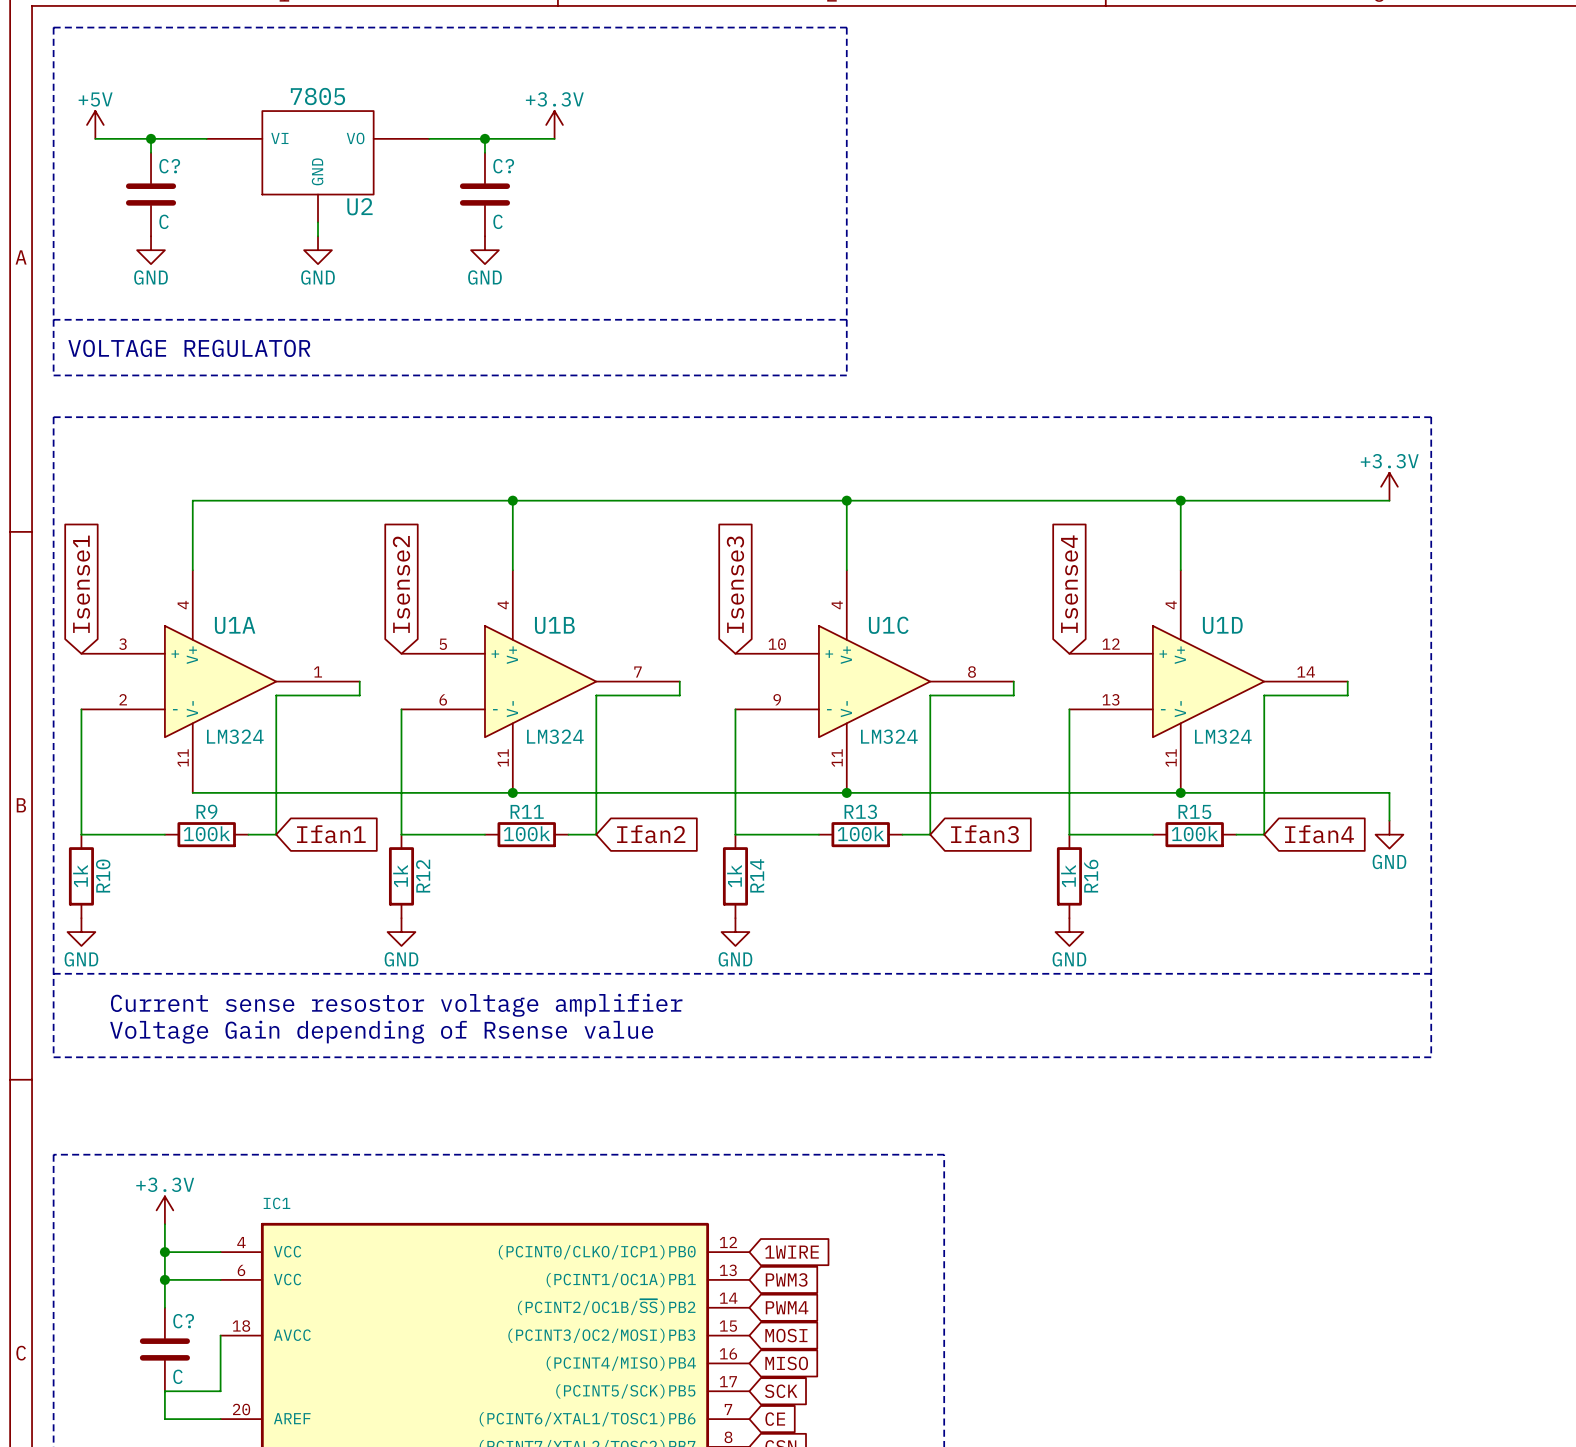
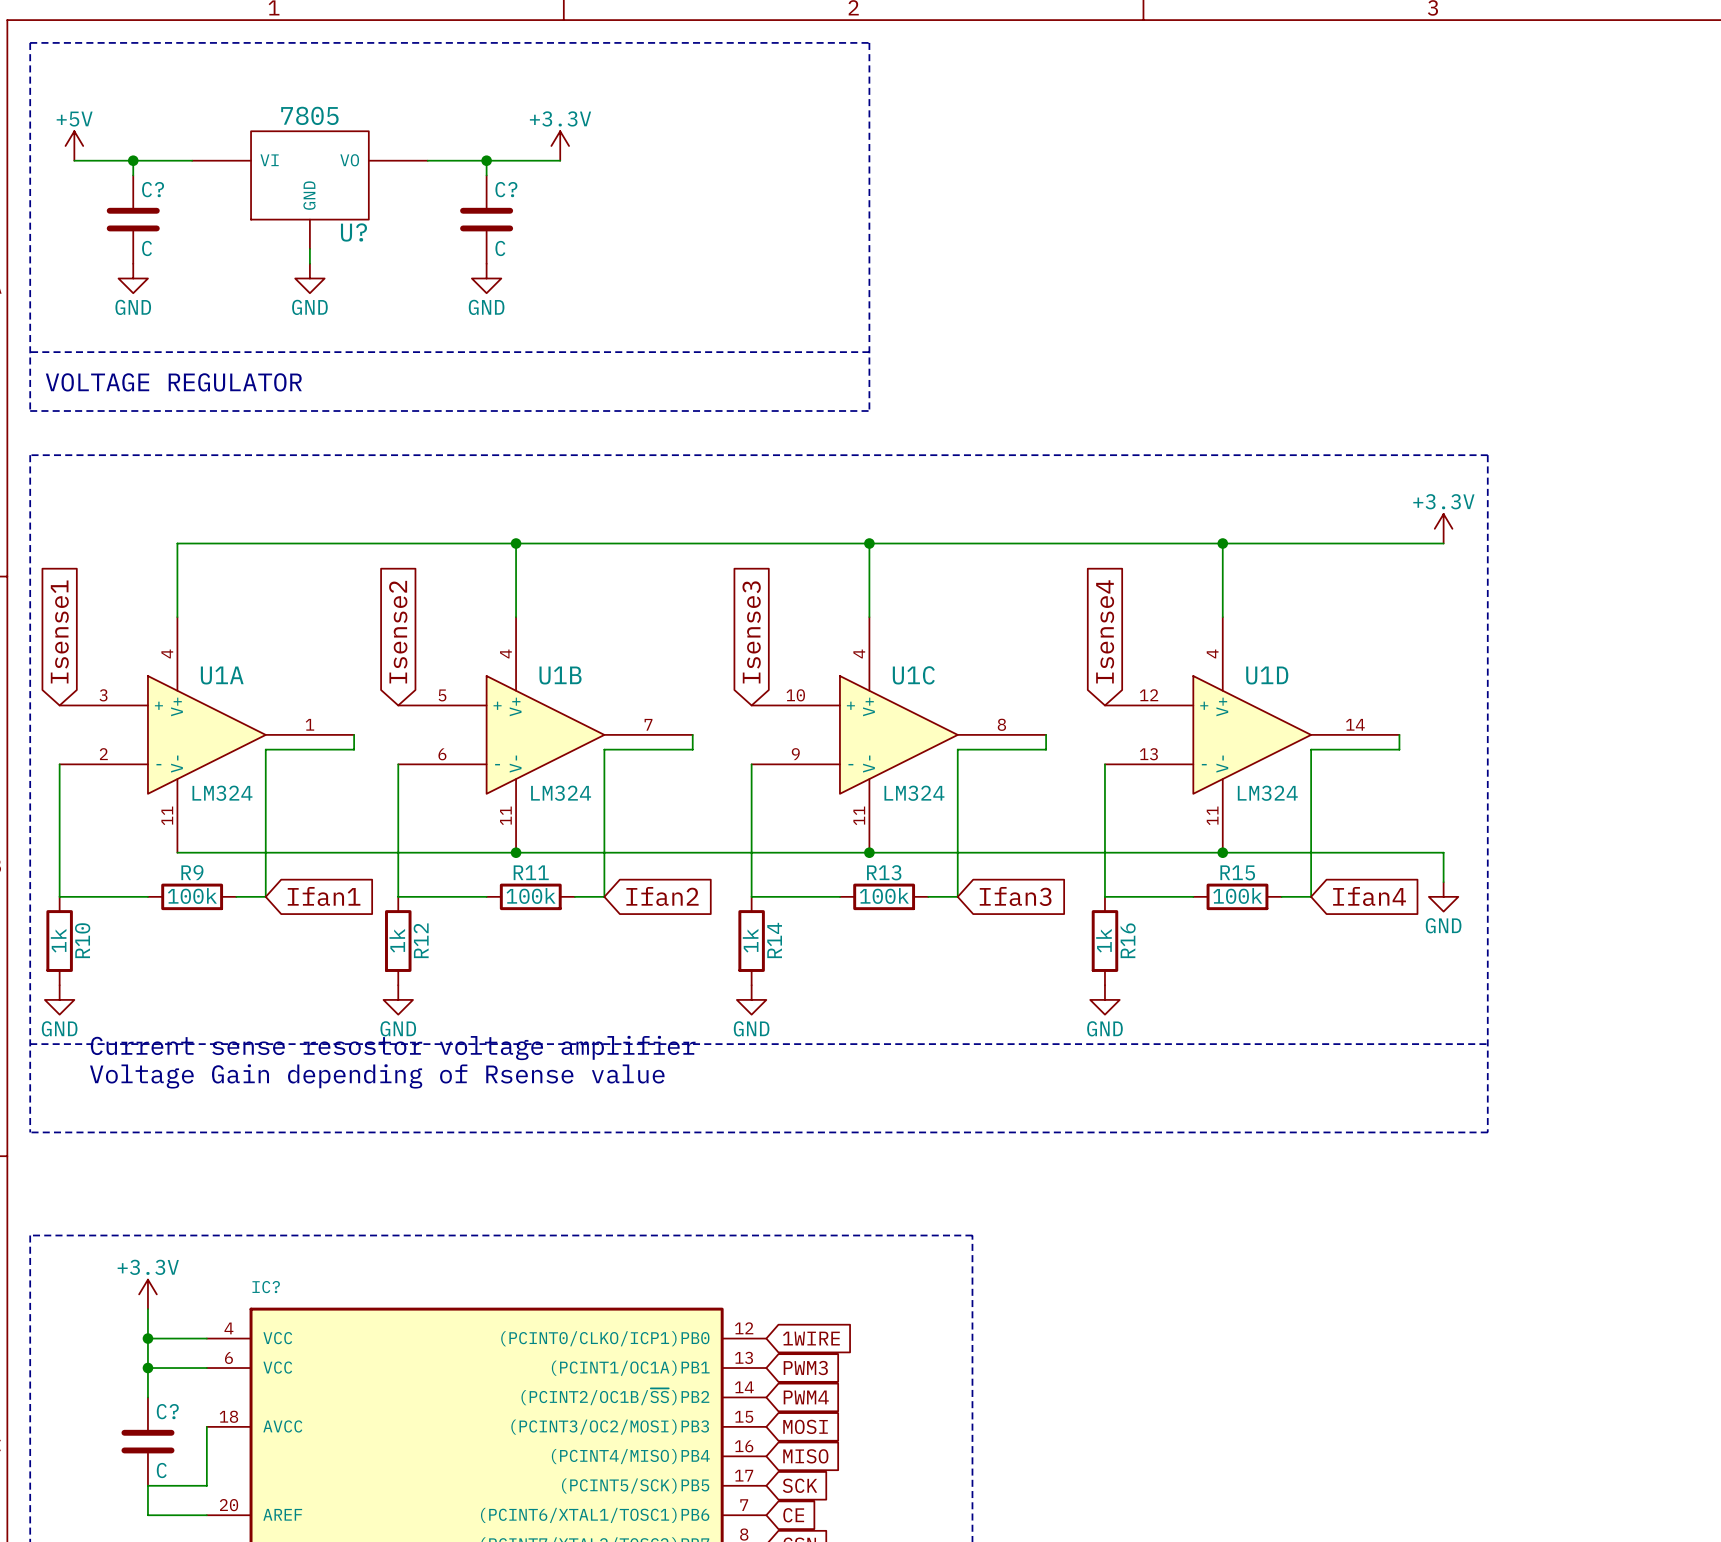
U2 name: U2 (359, 206) -> U? (353, 232)
text: none -> Current sense resostor voltage amplifier (393, 1047)
text: Current sense resostor voltage amplifier (396, 1005) -> Voltage Gain depending of Rsense value (377, 1076)
text: Voltage Gain depending of Rsense value (381, 1032) -> none
IC1 name: IC1 (276, 1203) -> IC? (266, 1287)

